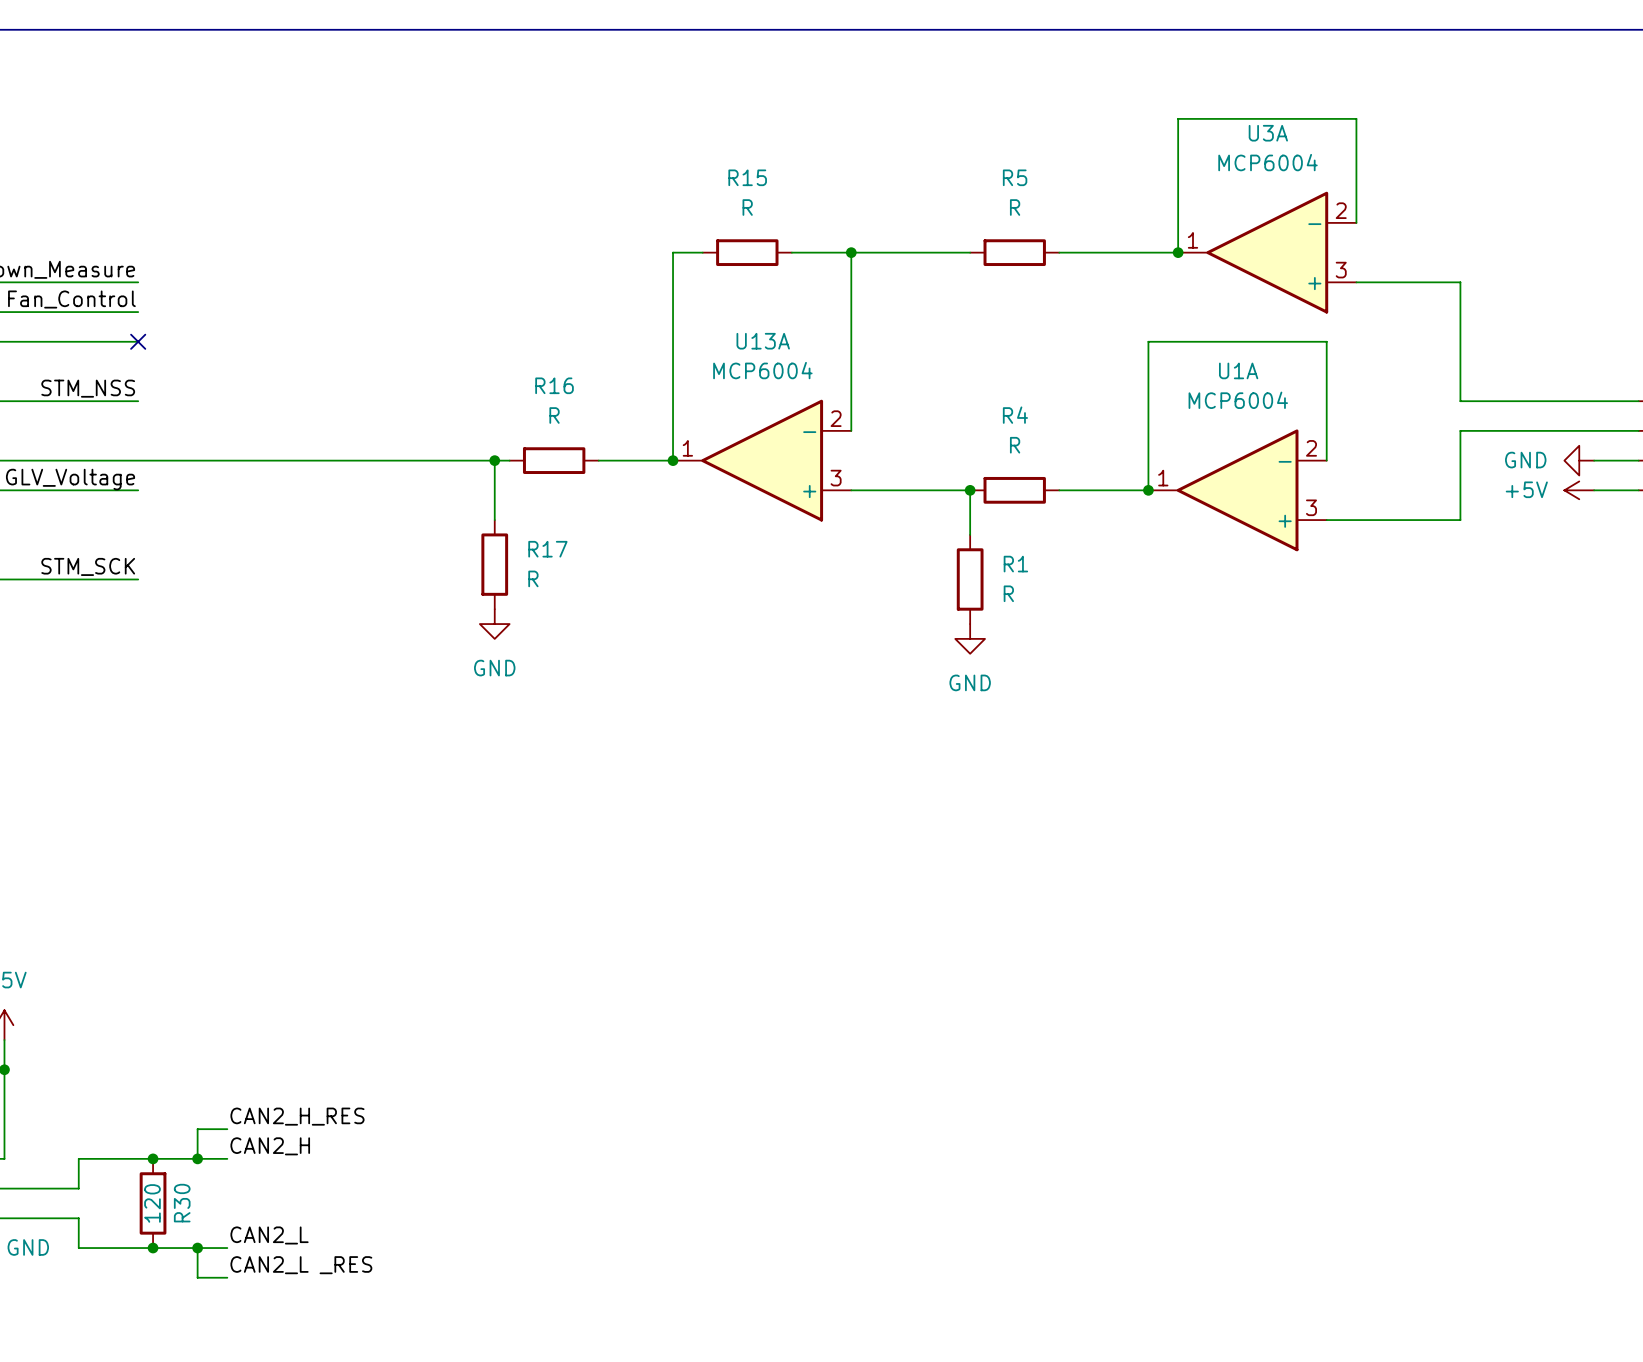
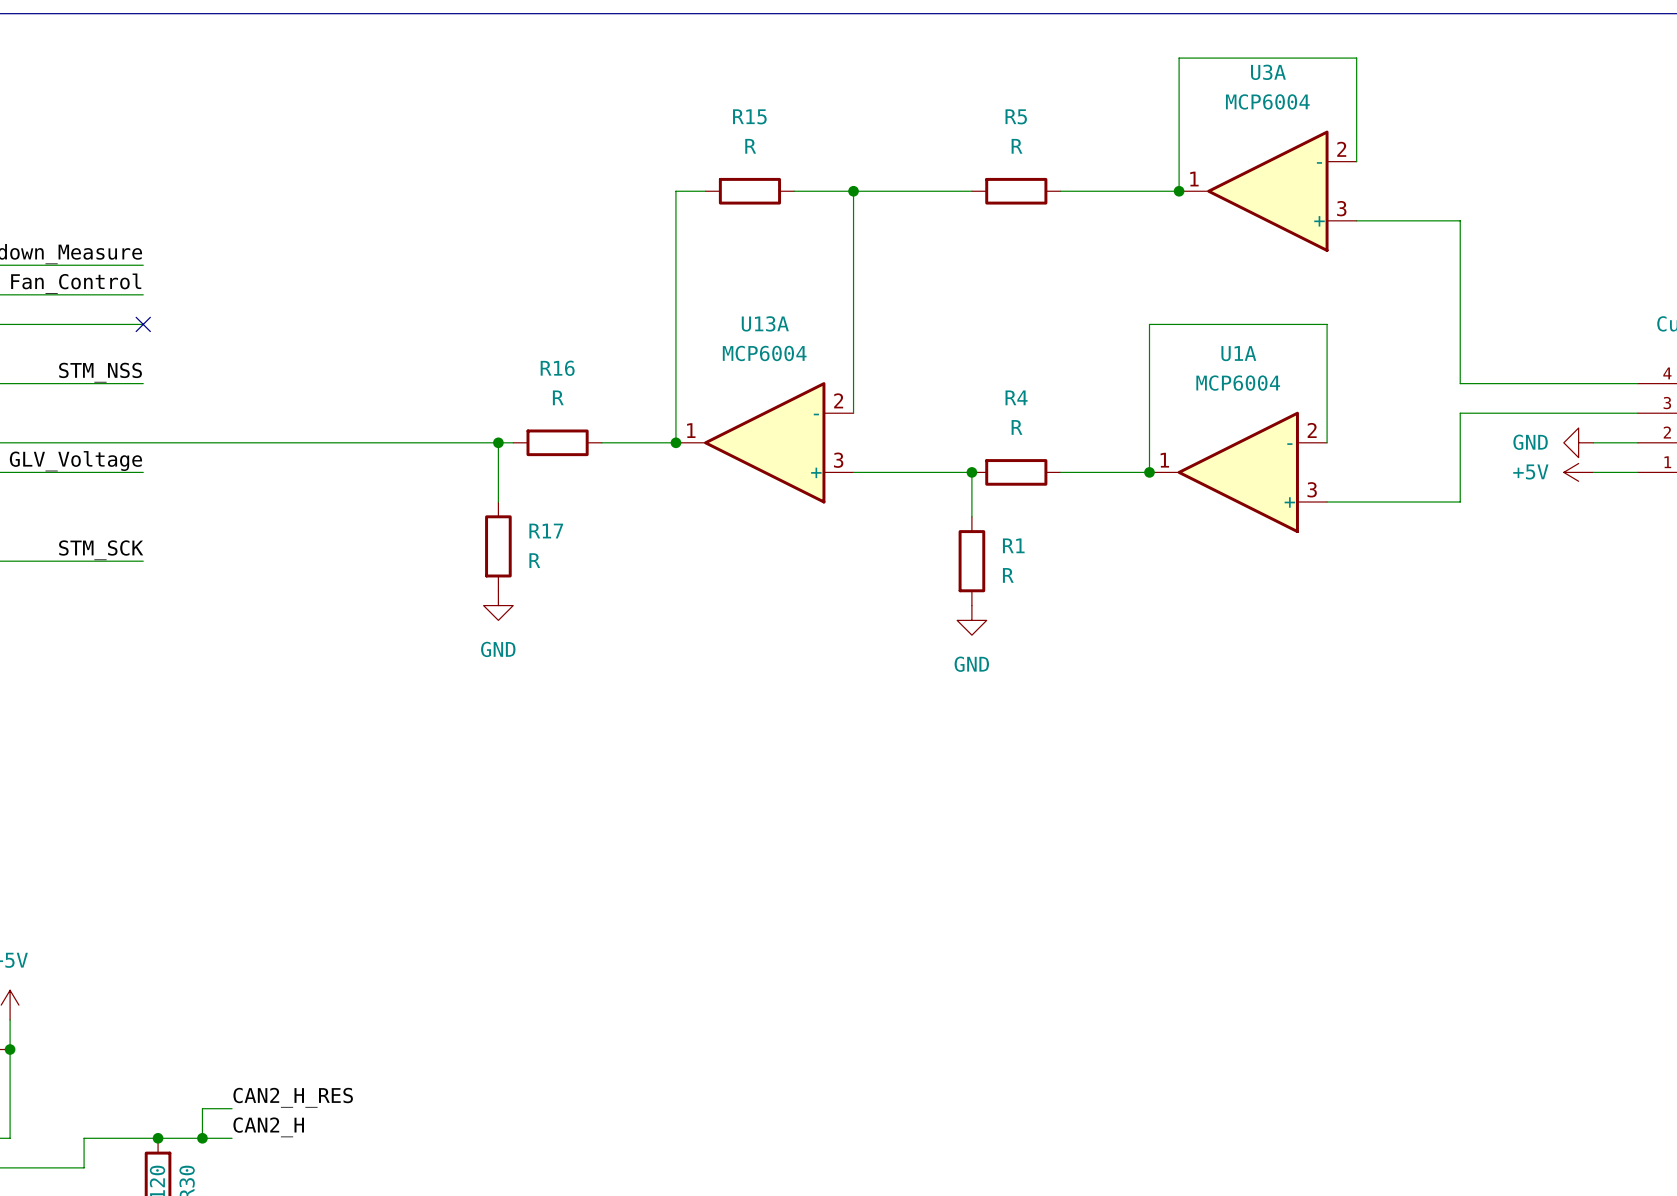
wire: (1178, 118) (1356, 118) -> (1179, 102) (1179, 58) (1356, 58) (1356, 102)
wire: (1356, 178) (1356, 222) -> none
wire: none -> (853, 191) (853, 235)
wire: (1178, 208) (1178, 252) (1059, 252) -> (1179, 191) (1060, 191)
wire: (673, 252) (702, 252) -> (675, 235) (675, 191) (705, 191)
R15 position: (747, 252) -> (749, 191)
wire: (791, 252) (970, 252) -> (794, 191) (971, 191)
junction position: (851, 252) -> (853, 191)
R5 position: (1014, 252) -> (1016, 191)
junction position: (1178, 252) -> (1179, 191)
U3A position: (1267, 252) -> (1267, 191)
wire: (1356, 282) (1460, 282) -> (1356, 220) (1460, 220) (1460, 265)

